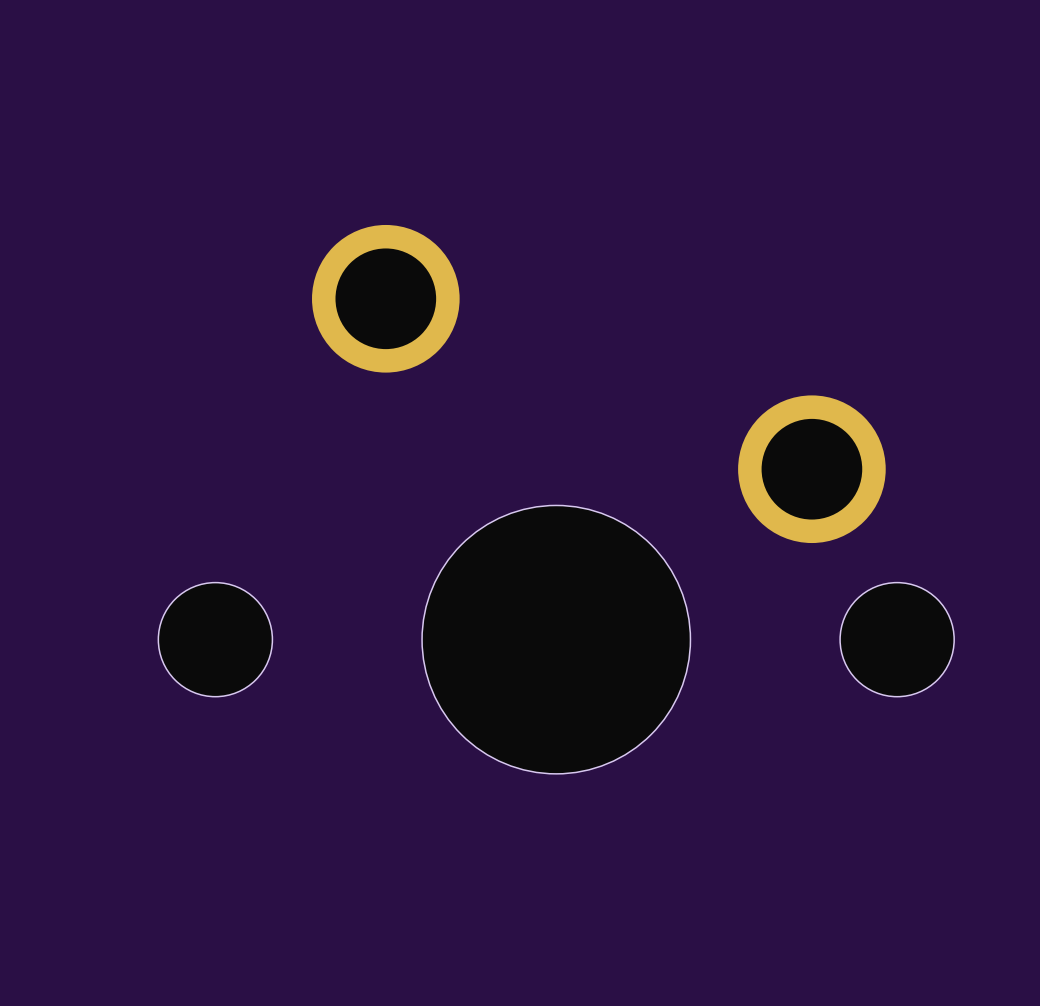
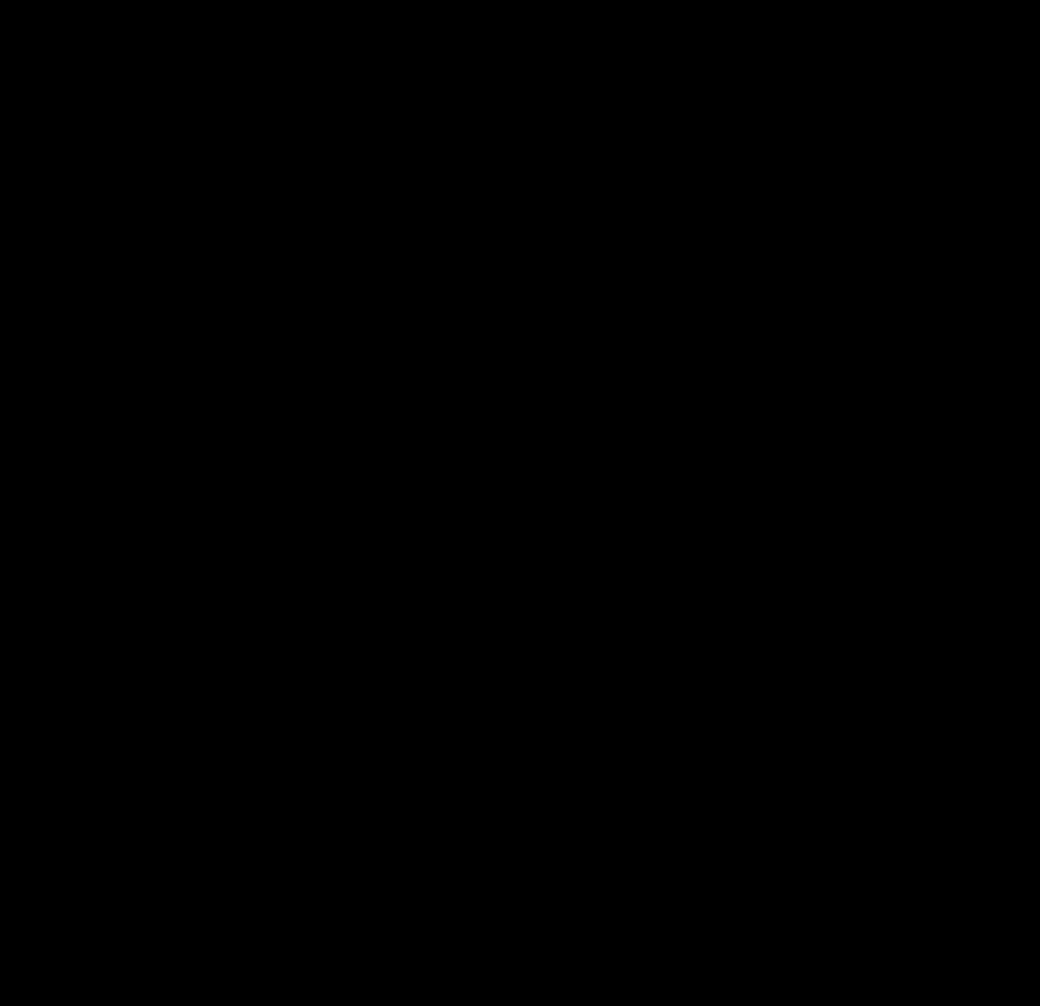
part: (556, 499) -> none

